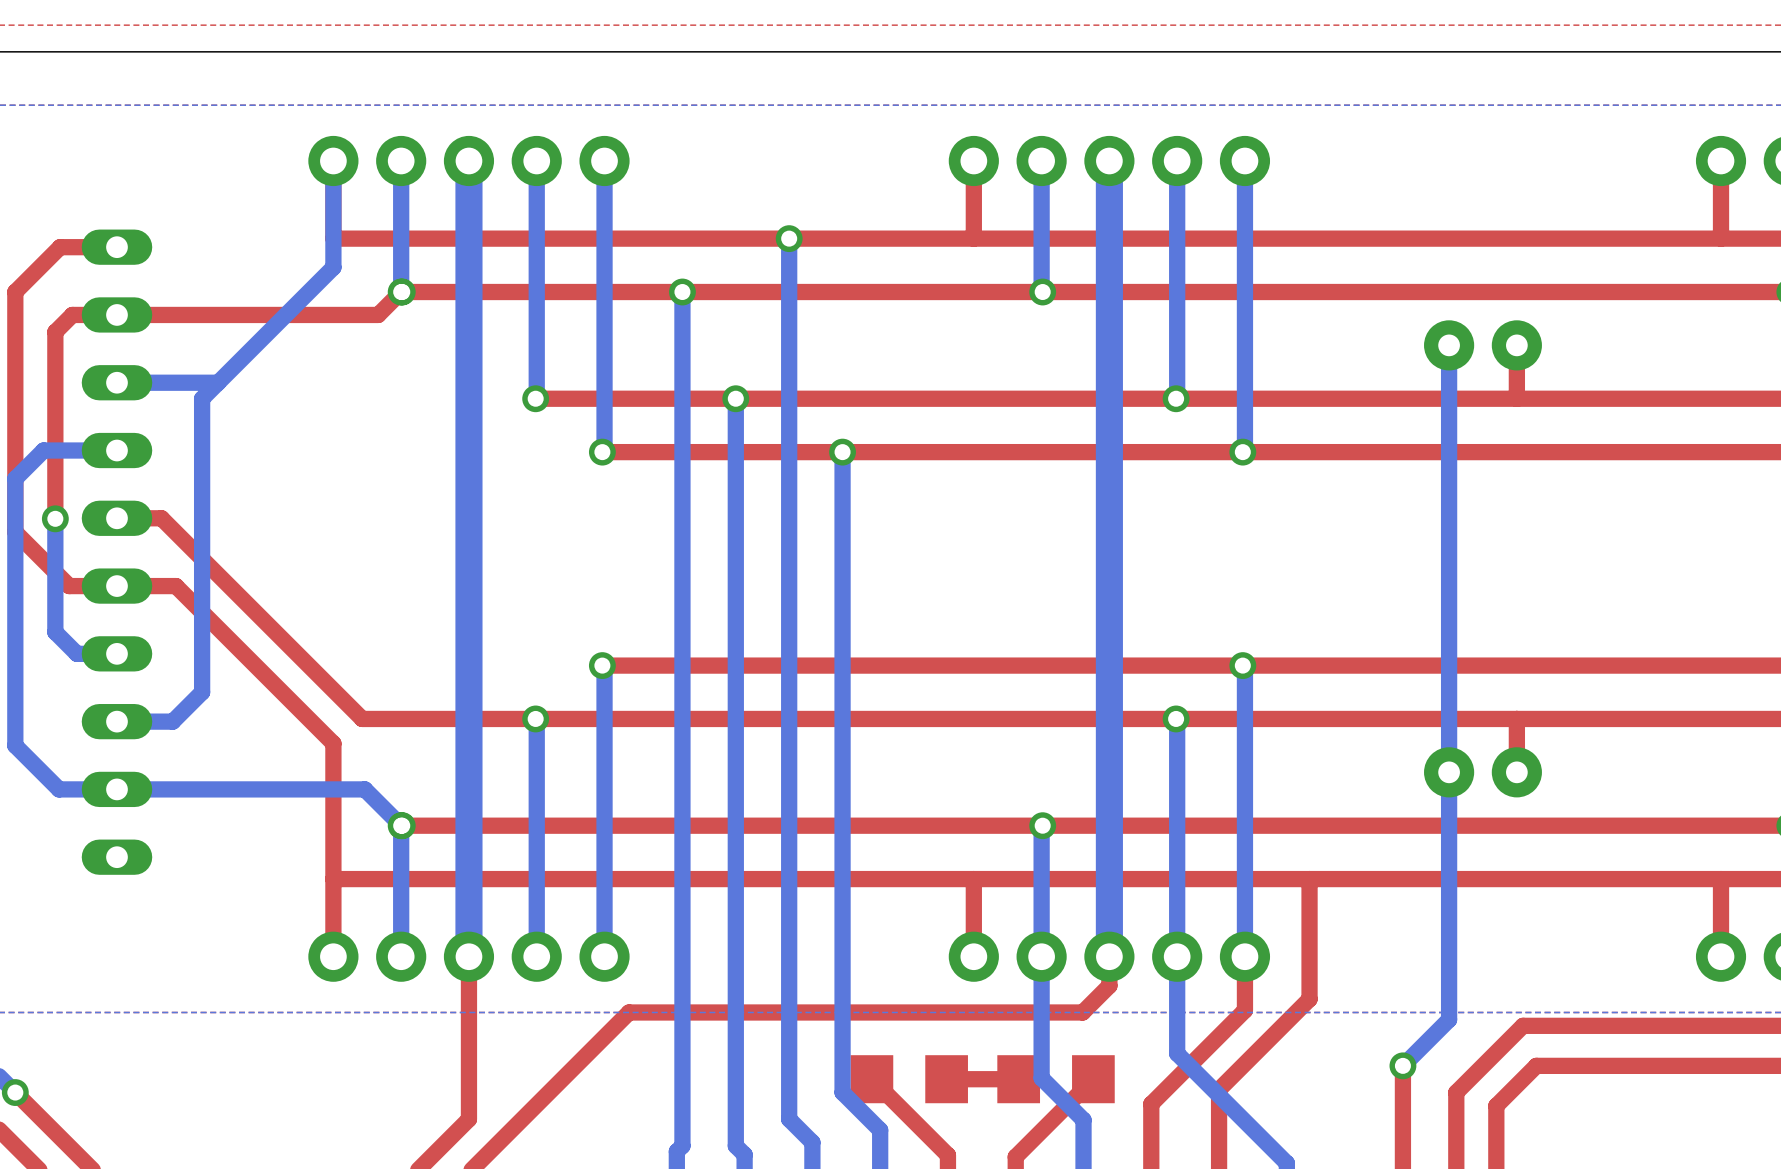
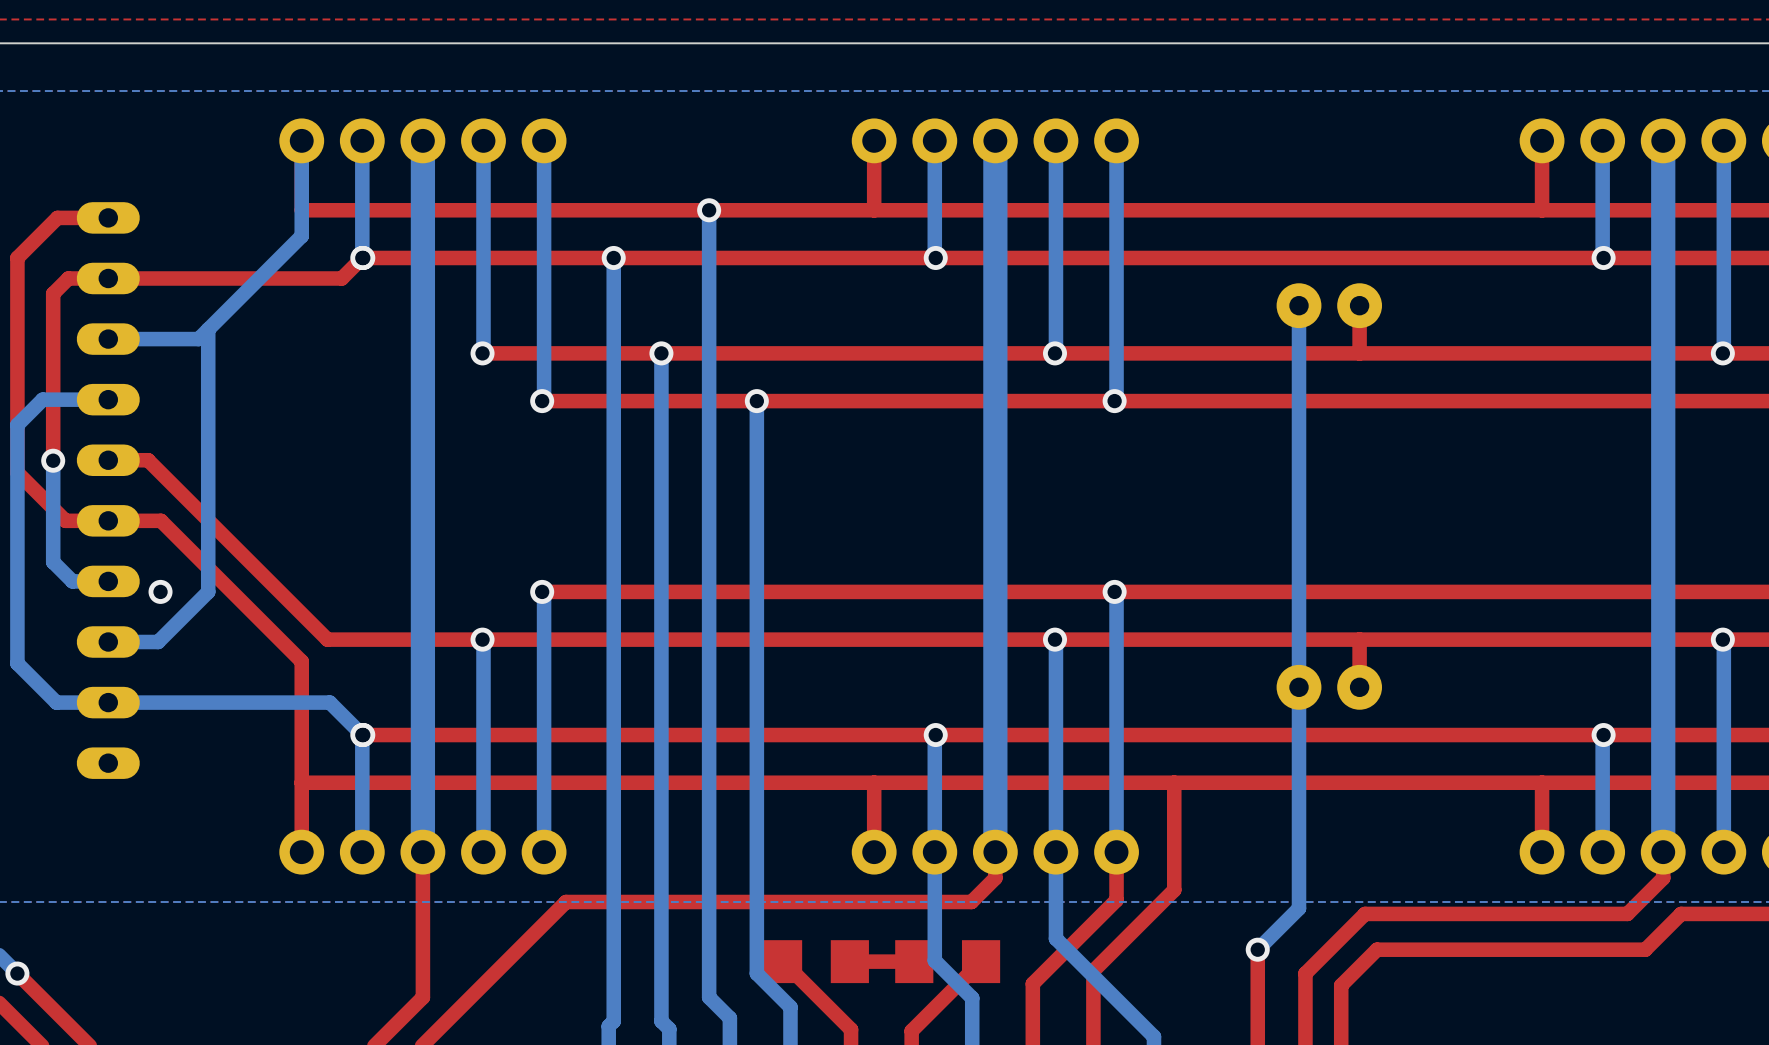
bottom track: (218, 382) (202, 398) (202, 692) -> (208, 329) (208, 591) (184, 615)
via: none -> (160, 591)

